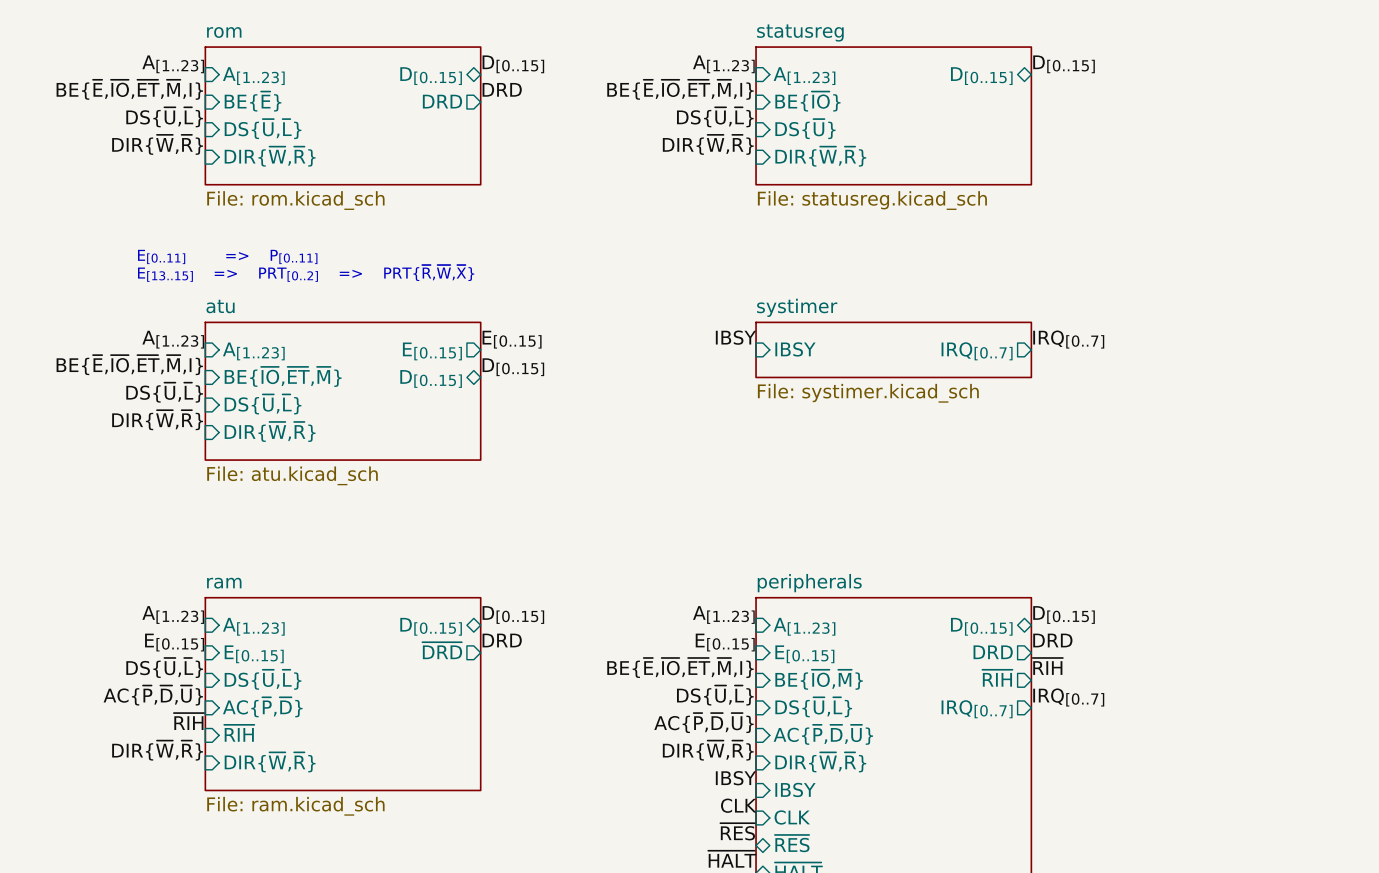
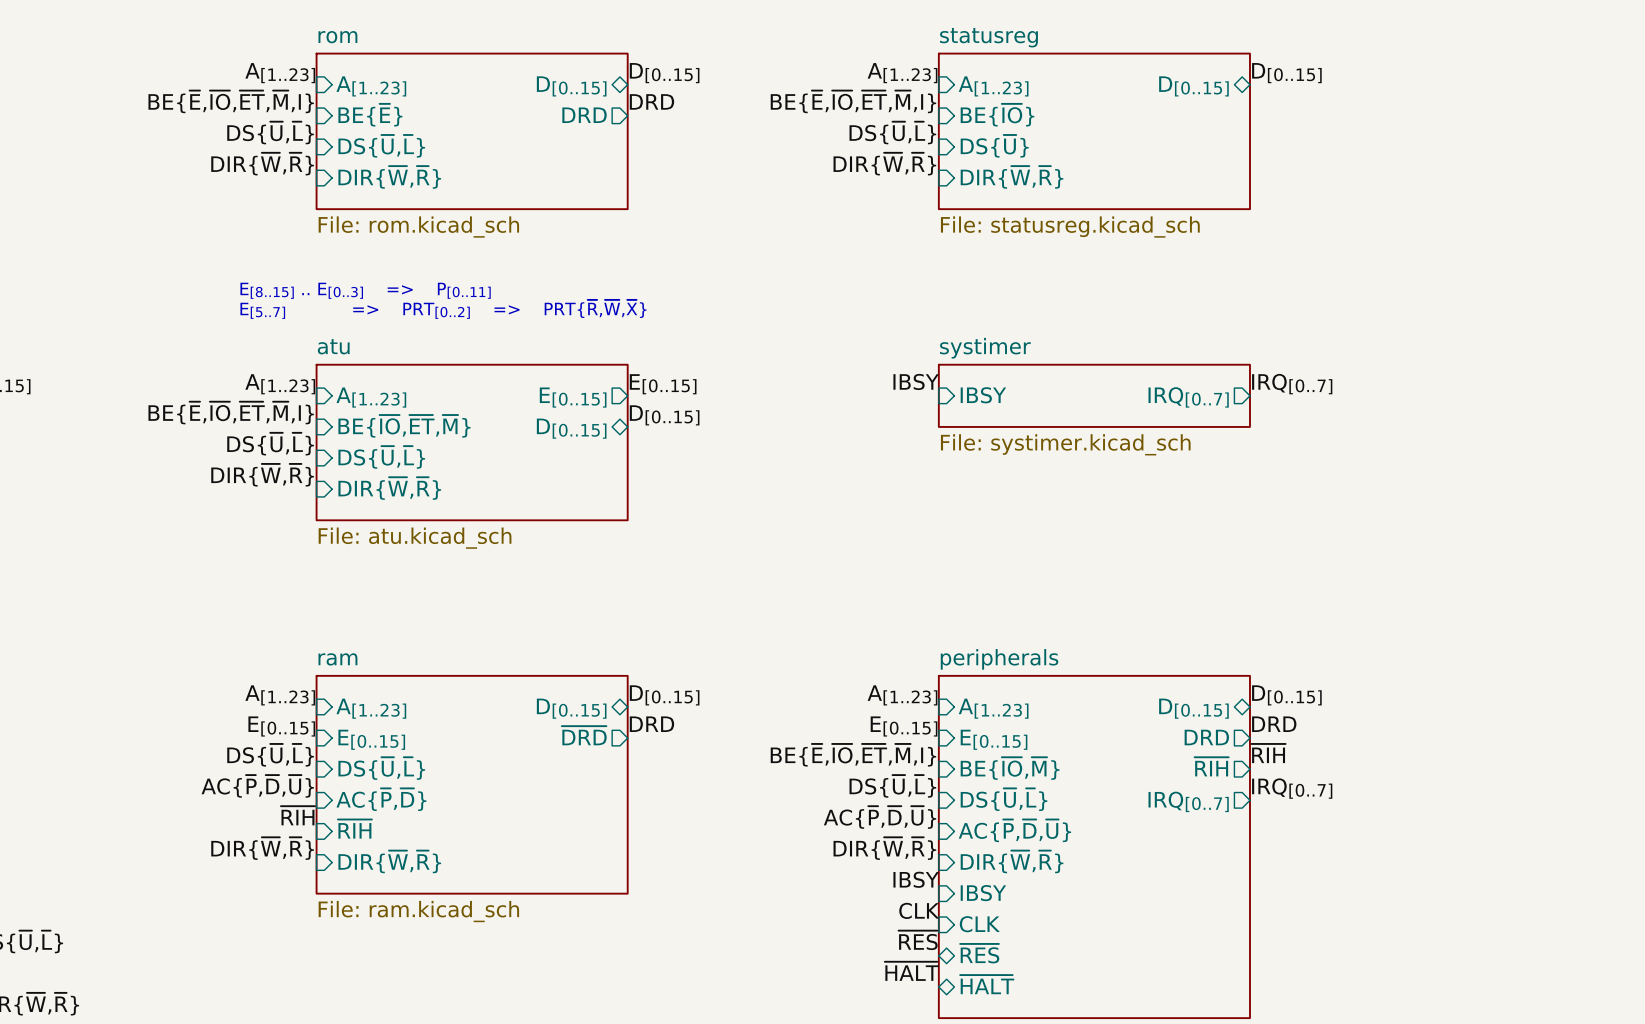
text: E[0..11] => P[0..11] (227, 256) -> E[8..15] .. E[0..3] => P[0..11] (365, 290)
text: E[13..15] => PRT[0..2] => PRT{~{R},~{W},~{X}} (306, 273) -> E[5..7] => PRT[0..2] => PRT{~{R},~{W},~{X}} (443, 309)

